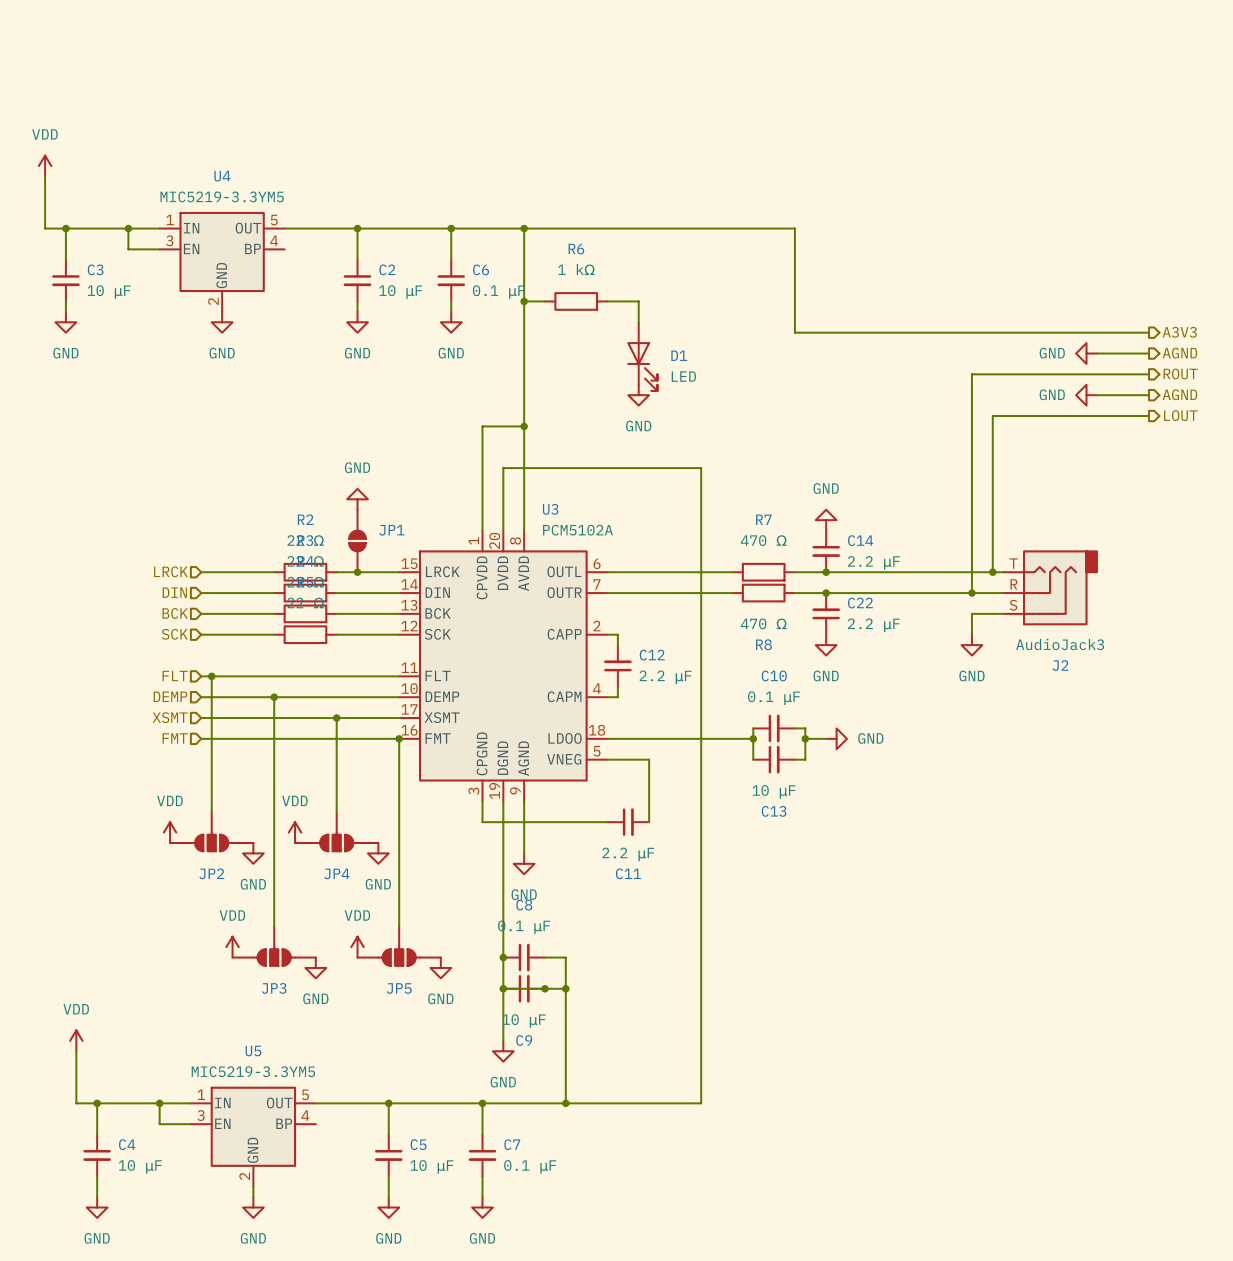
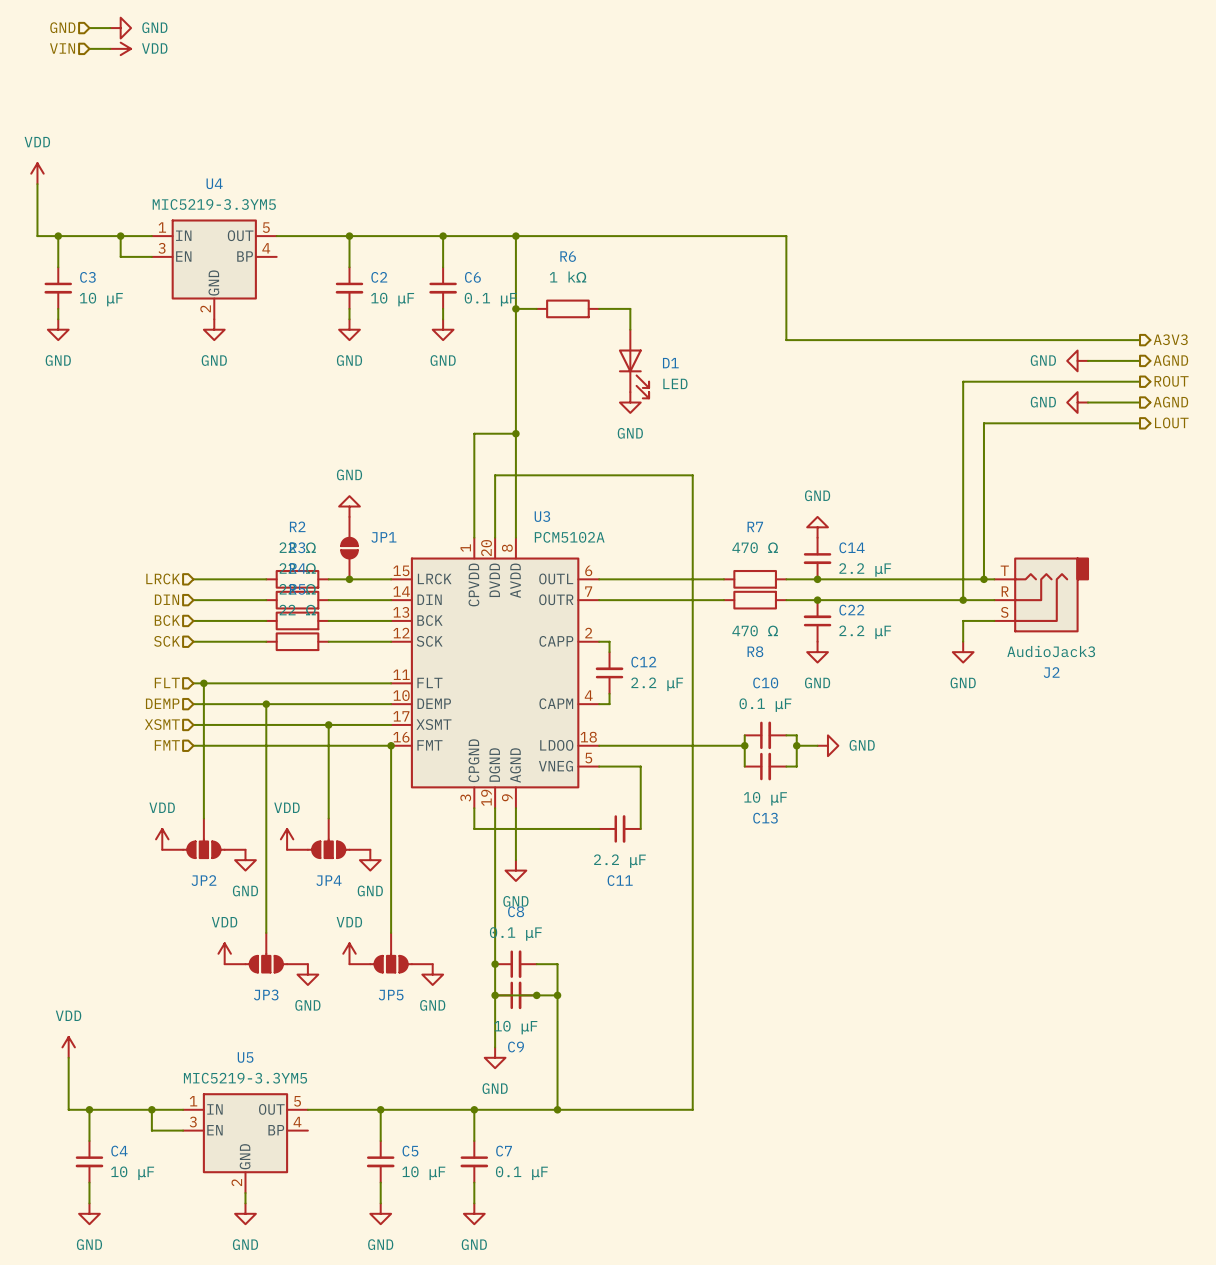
hierarchical label: none -> GND (62, 27)
wire: none -> (89, 28) (110, 28)
power symbol: none -> GND (120, 28)
hierarchical label: none -> VIN (62, 48)
wire: none -> (89, 48) (110, 48)
power symbol: none -> VDD (120, 48)

